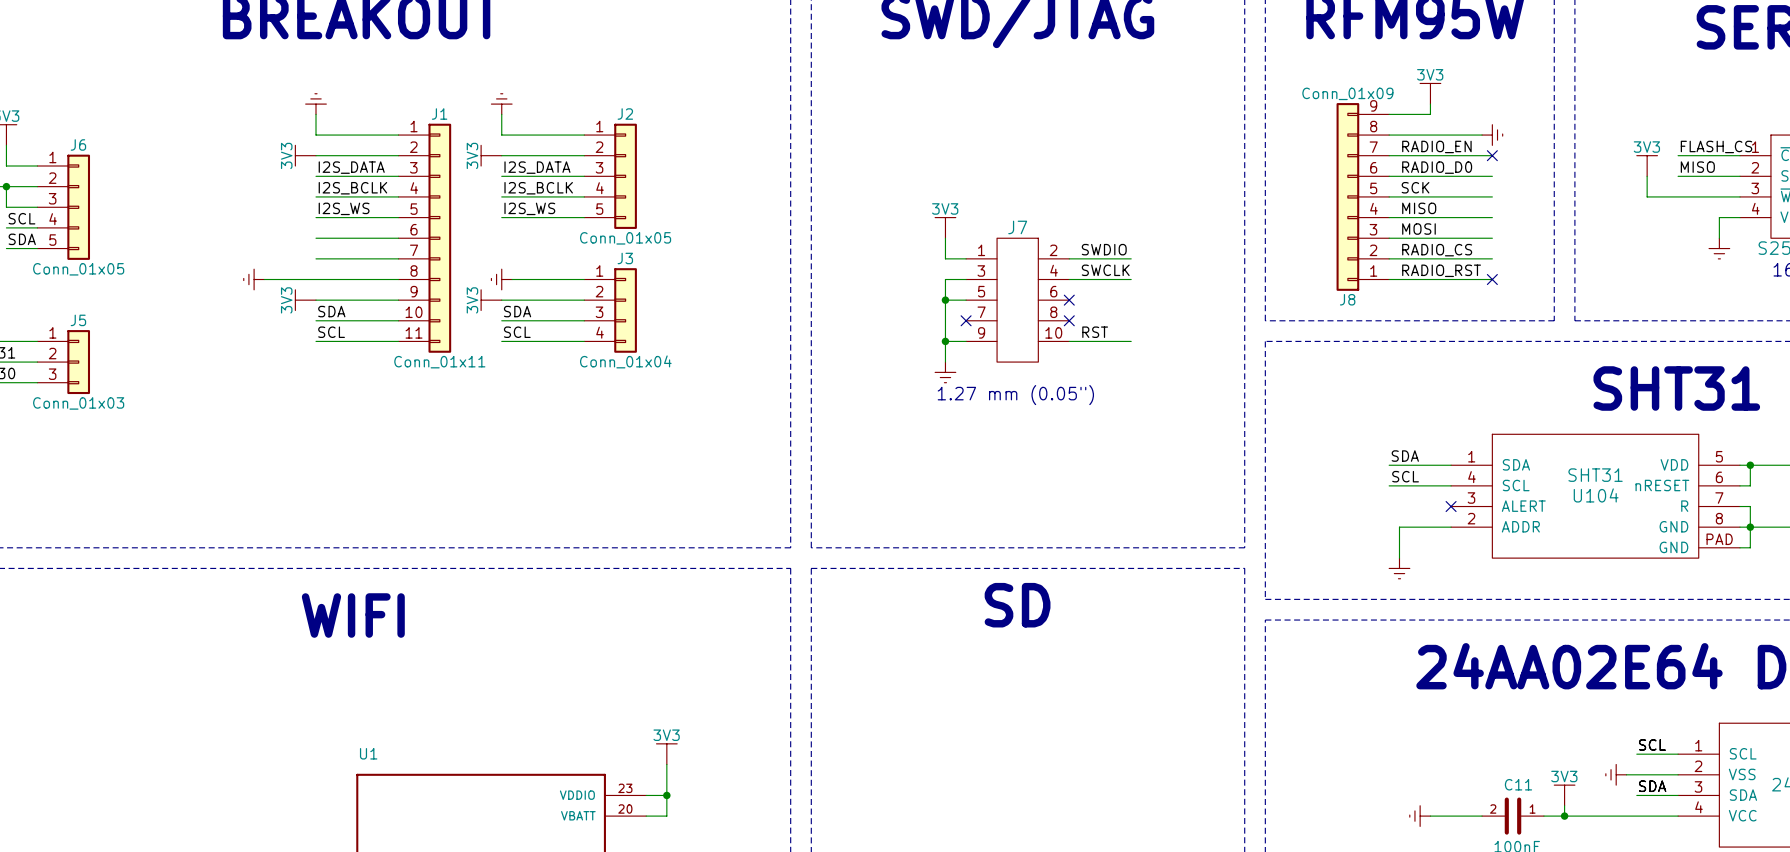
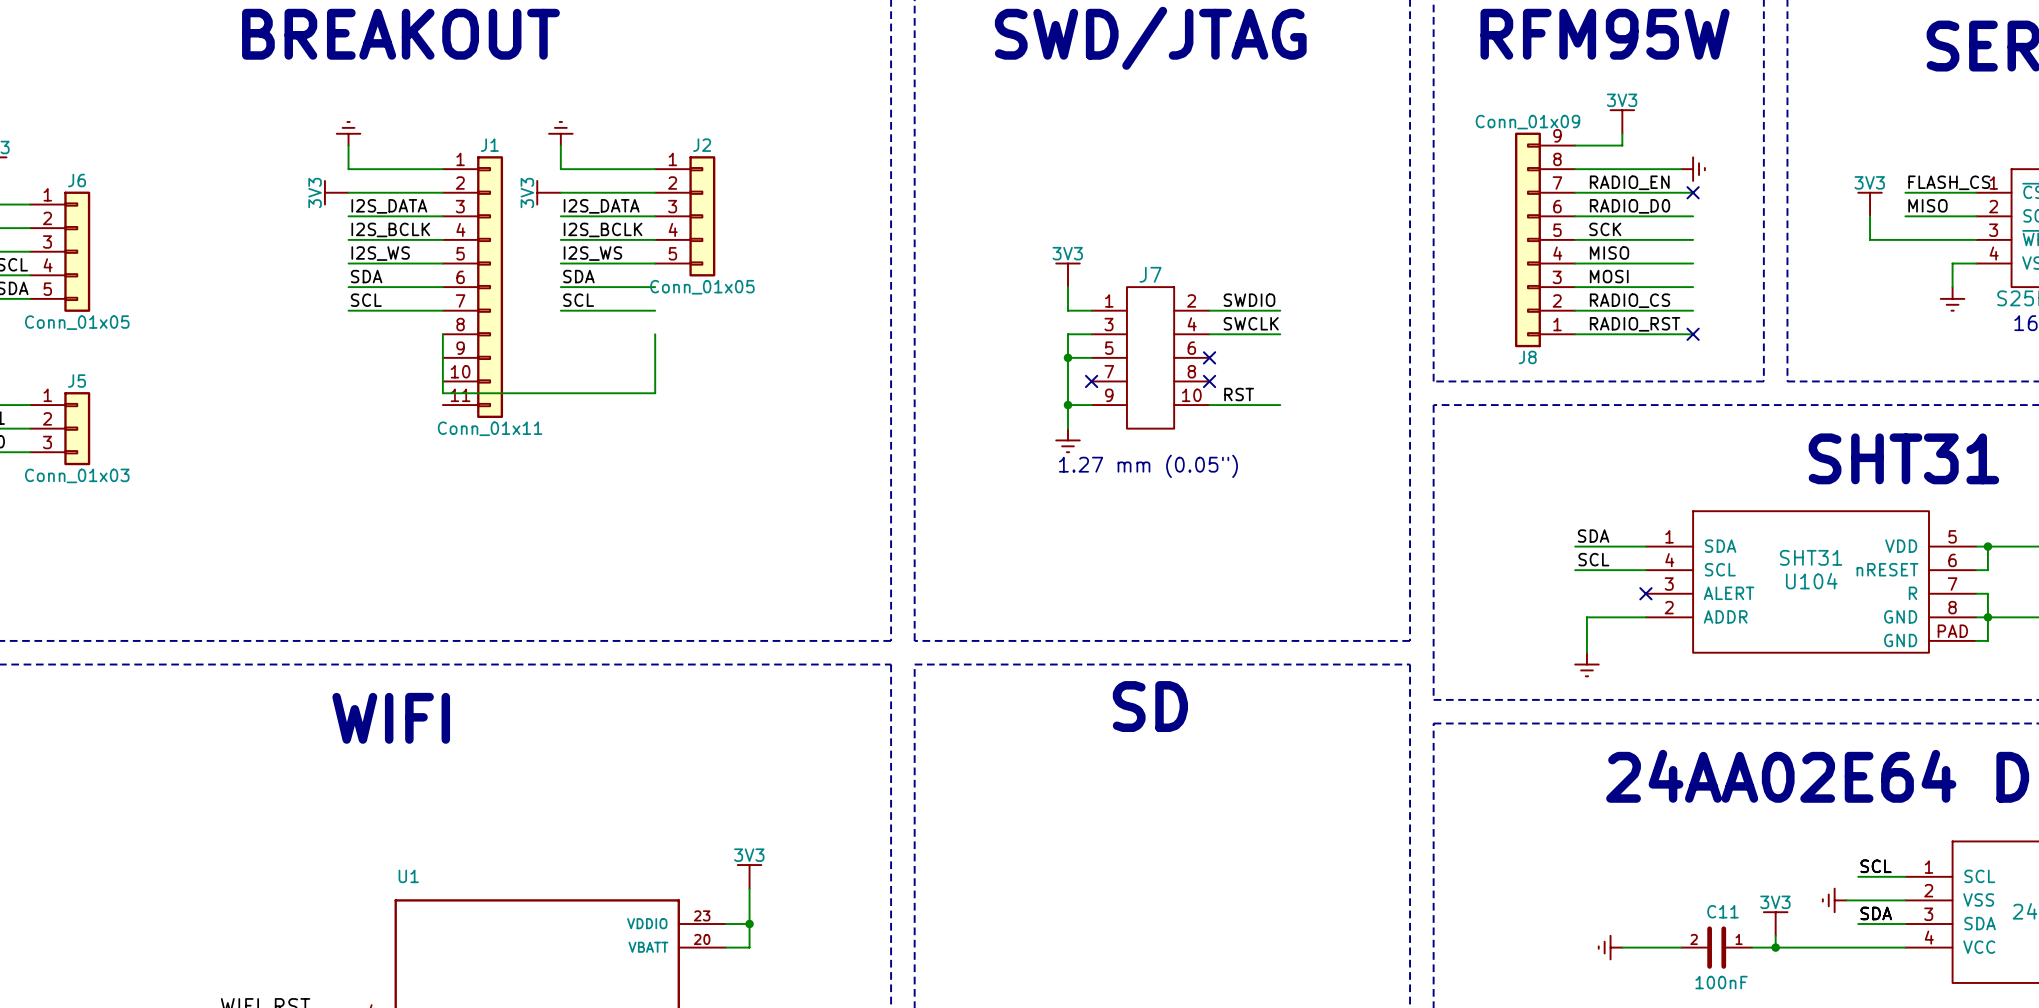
power symbol: (254, 279) -> none
wire: (264, 279) (398, 279) -> none
power symbol: (501, 279) -> none
wire: (512, 279) (584, 279) -> (442, 334) (442, 393) (655, 393) (655, 334)
power symbol: 3V3 (305, 300) -> none
wire: (316, 300) (398, 300) -> none
power symbol: 3V3 (491, 300) -> none
wire: (501, 300) (584, 300) -> (560, 287) (655, 287)
J3: Conn_01x04 (610, 310) -> none
label position: SDA (331, 311) -> SDA (366, 276)
label position: SDA (517, 311) -> SDA (578, 276)
wire: (316, 320) (398, 320) -> none
wire: (501, 320) (584, 320) -> (560, 310) (655, 310)
label position: SCL (331, 332) -> SCL (366, 300)
label position: SCL (517, 332) -> SCL (578, 300)
wire: (316, 341) (398, 341) -> none
wire: (501, 341) (584, 341) -> none

